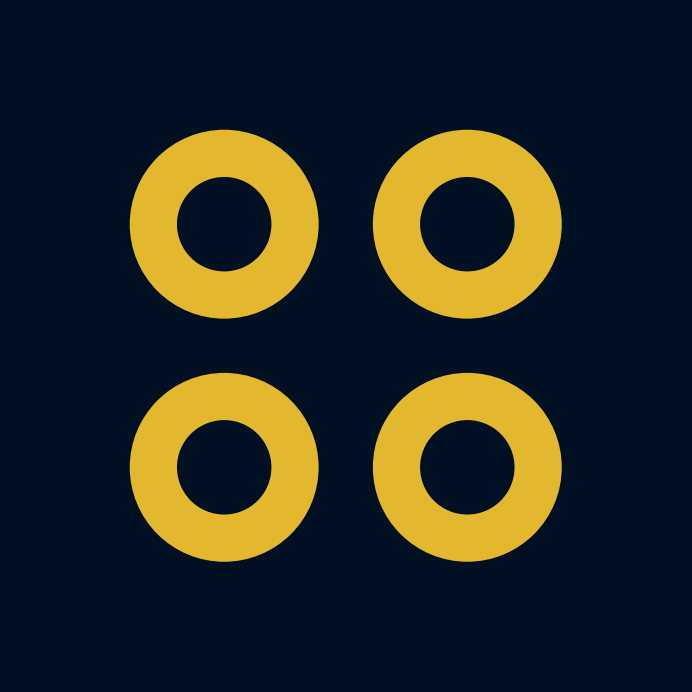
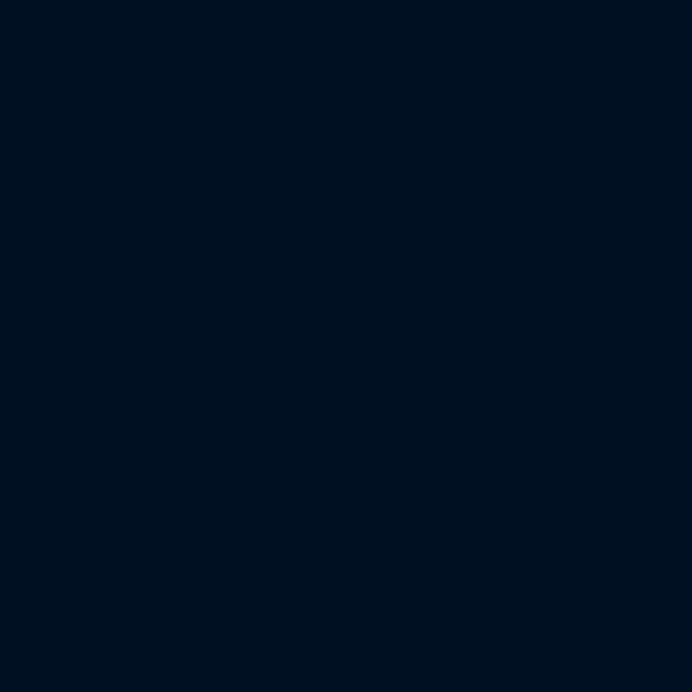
part: (224, 224) -> none
part: (467, 224) -> none
part: (224, 467) -> none
part: (467, 467) -> none

